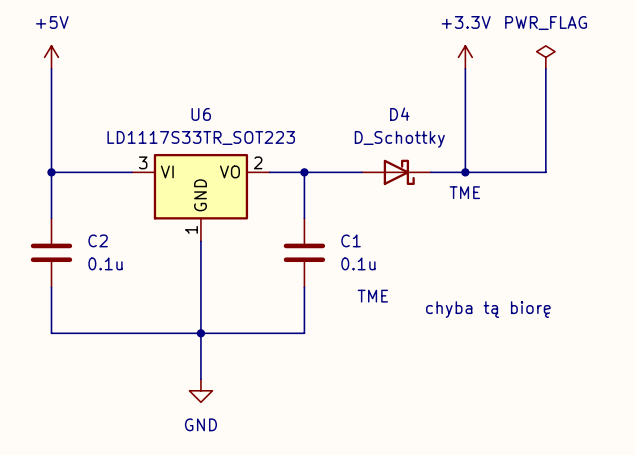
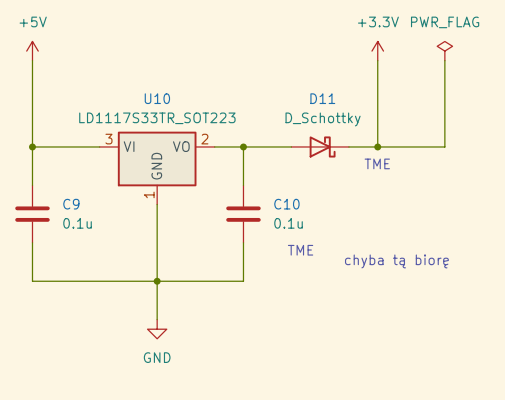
U6 name: U6 (201, 114) -> U10 (157, 98)
D4 name: D4 (399, 114) -> D11 (322, 98)
C2 name: C2 (98, 240) -> C9 (71, 204)
C1 name: C1 (351, 240) -> C10 (286, 204)

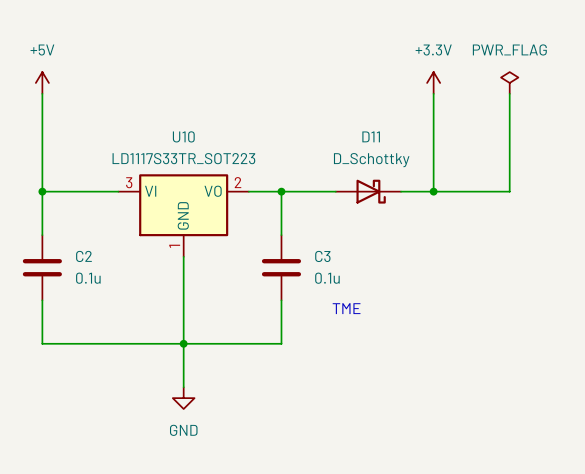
text: TME (377, 163) -> none
C9 name: C9 (71, 204) -> C2 (83, 256)
C10 name: C10 (286, 204) -> C3 (322, 256)
text: chyba tą biorę (396, 261) -> none

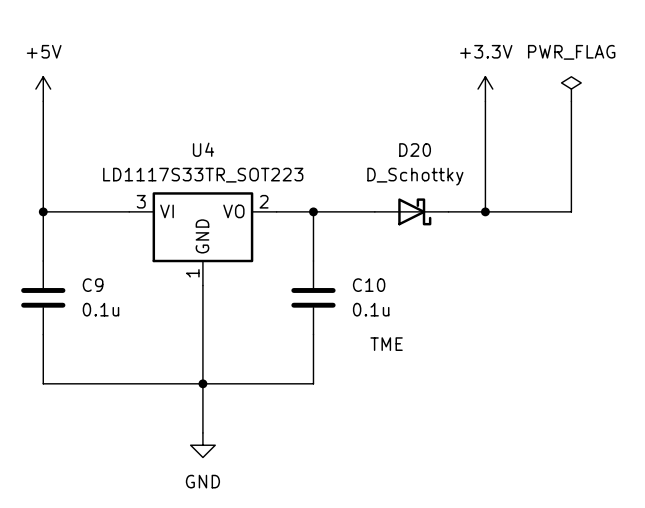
U10 name: U10 (183, 136) -> U4 (203, 149)
D11 name: D11 (371, 136) -> D20 (415, 150)
C2 name: C2 (83, 256) -> C9 (93, 285)
C3 name: C3 (322, 256) -> C10 (369, 285)

